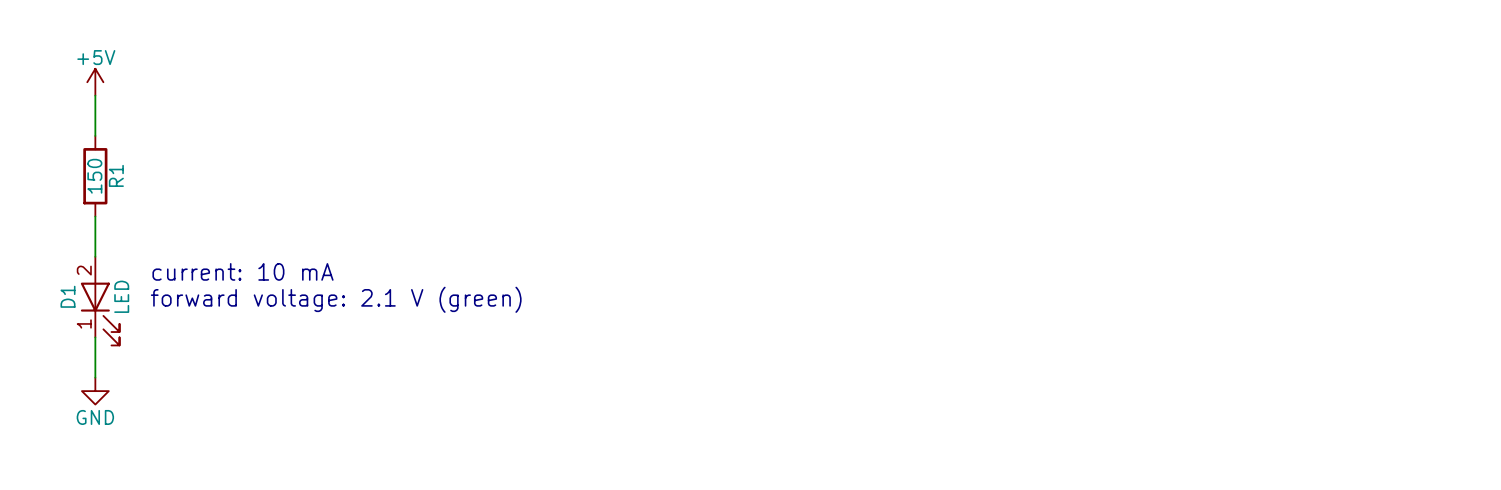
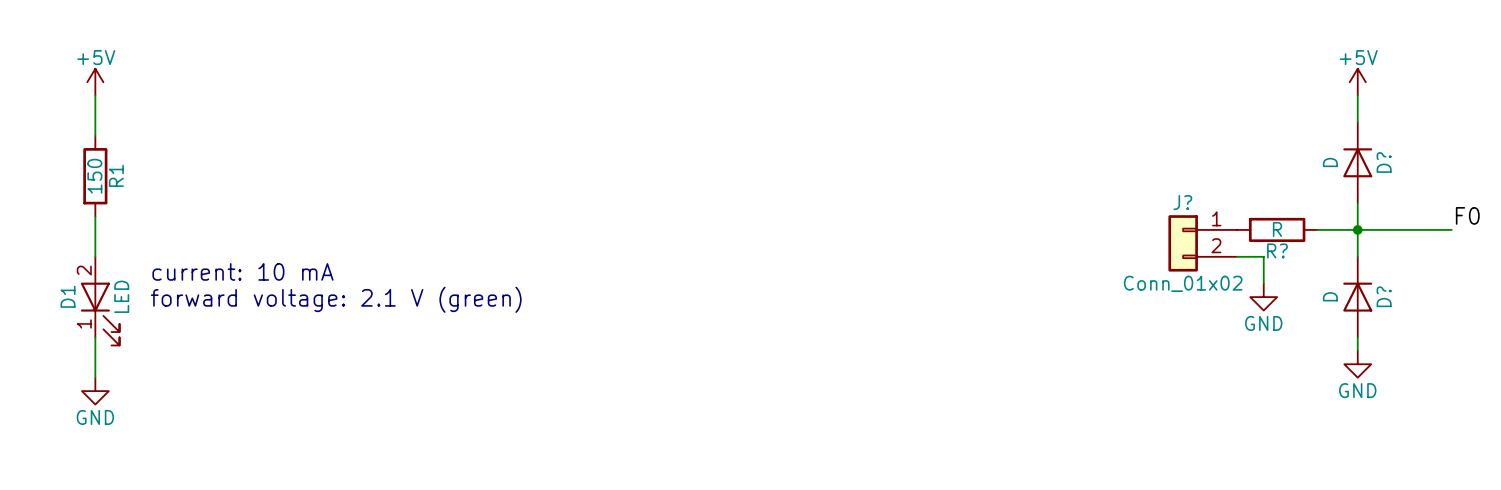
power symbol: none -> +5V (1357, 82)
wire: none -> (1357, 95) (1357, 122)
D?: none -> D (1357, 162)
wire: none -> (1357, 203) (1357, 256)
label: none -> F0 (1467, 215)
R?: none -> R (1277, 229)
wire: none -> (1317, 229) (1451, 229)
junction: none -> (1357, 229)
J?: none -> Conn_01x02 (1202, 243)
wire: none -> (1236, 256) (1263, 256) (1263, 283)
power symbol: none -> GND (1263, 297)
D?: none -> D (1357, 297)
wire: none -> (1357, 337) (1357, 350)
power symbol: none -> GND (1357, 364)

